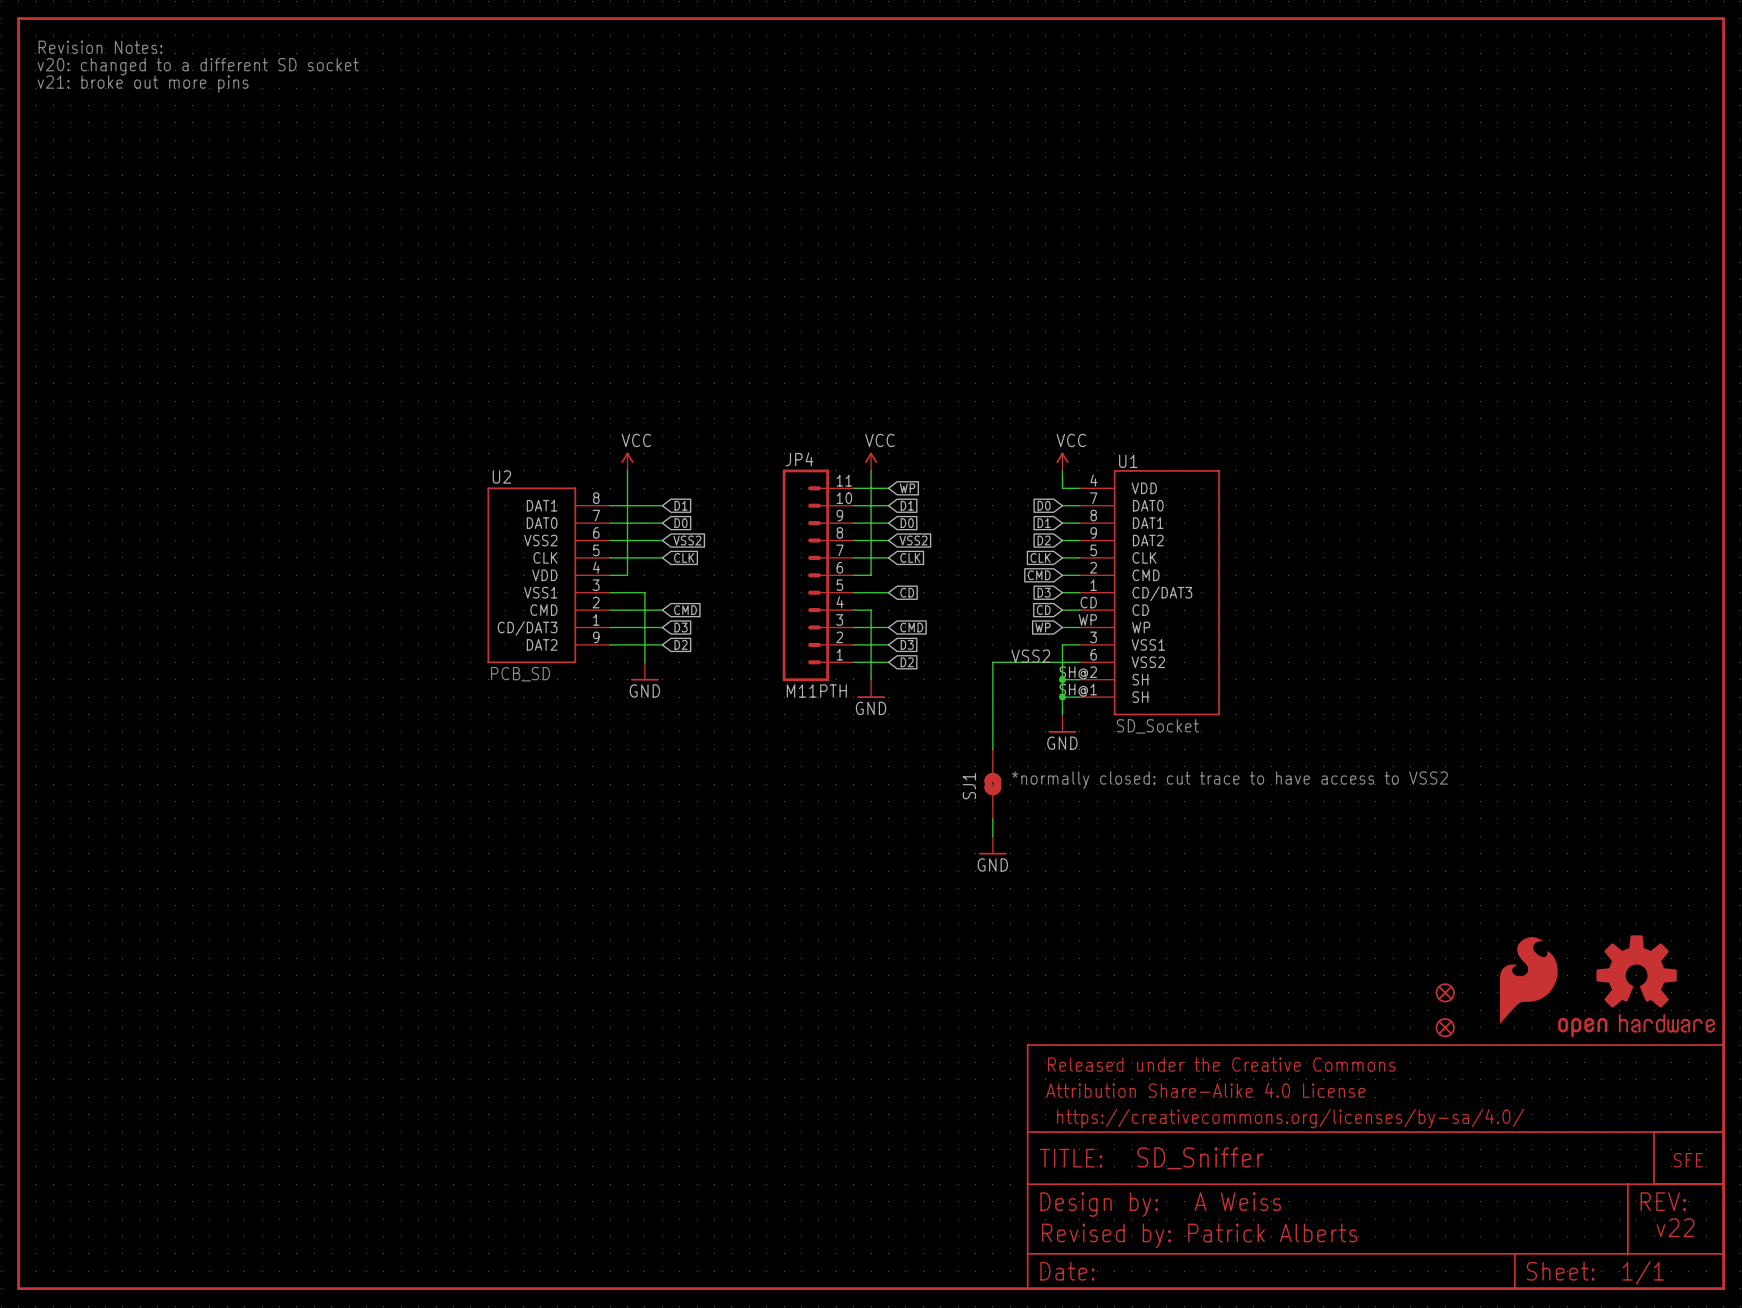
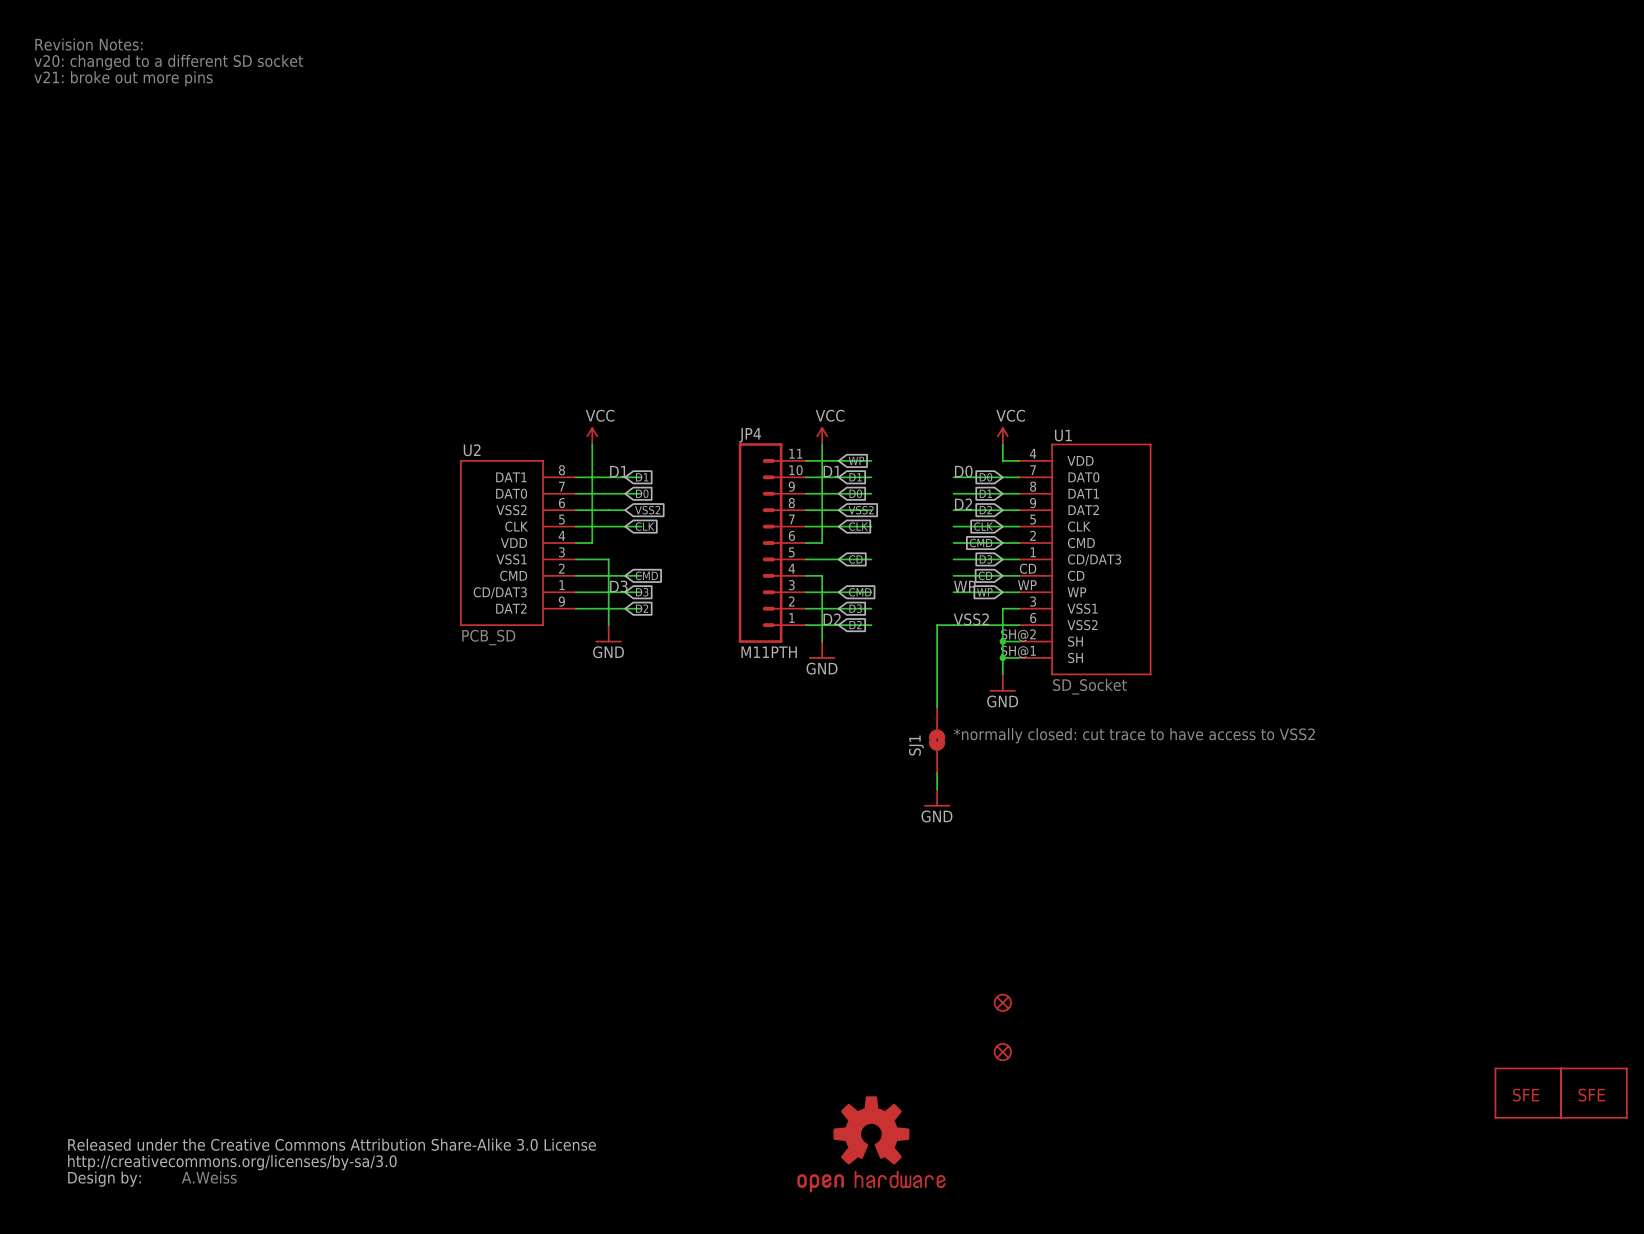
wire: none -> (838, 460) (871, 460)
label: none -> D1 (618, 471)
label: none -> D1 (832, 471)
label: none -> D0 (963, 471)
wire: none -> (625, 477) (641, 477)
wire: none -> (838, 477) (871, 477)
wire: none -> (953, 477) (1002, 477)
wire: none -> (625, 493) (641, 493)
wire: none -> (838, 493) (871, 493)
wire: none -> (953, 493) (1002, 493)
label: none -> D2 (963, 504)
wire: none -> (838, 510) (871, 510)
wire: none -> (953, 510) (1002, 510)
wire: none -> (625, 526) (641, 526)
wire: none -> (838, 526) (871, 526)
wire: none -> (953, 526) (1002, 526)
wire: none -> (953, 543) (1002, 543)
wire: none -> (838, 559) (871, 559)
wire: none -> (953, 559) (1002, 559)
wire: none -> (625, 575) (641, 575)
wire: none -> (953, 575) (1002, 575)
label: none -> D3 (618, 586)
label: none -> WP (964, 586)
wire: none -> (625, 592) (641, 592)
wire: none -> (838, 592) (871, 592)
wire: none -> (953, 592) (1002, 592)
wire: none -> (625, 608) (641, 608)
wire: none -> (838, 608) (871, 608)
part: (871, 653) -> none
label: none -> D2 (832, 619)
wire: none -> (838, 625) (871, 625)
part: (1528, 980) -> none
part: (1636, 986) -> none
part: (1445, 992) -> none
part: (1445, 1027) -> none
part: none -> (1002, 1002)
part: none -> (1002, 1052)
part: none -> (1528, 1093)
part: (1375, 1166) -> none
text: A Weiss (1237, 1201) -> none
part: none -> (871, 1144)
text: v22 (1675, 1227) -> none
part: none -> (332, 1162)
text: Revised by: Patrick Alberts (1199, 1235) -> none
text: none -> A.Weiss (209, 1177)

